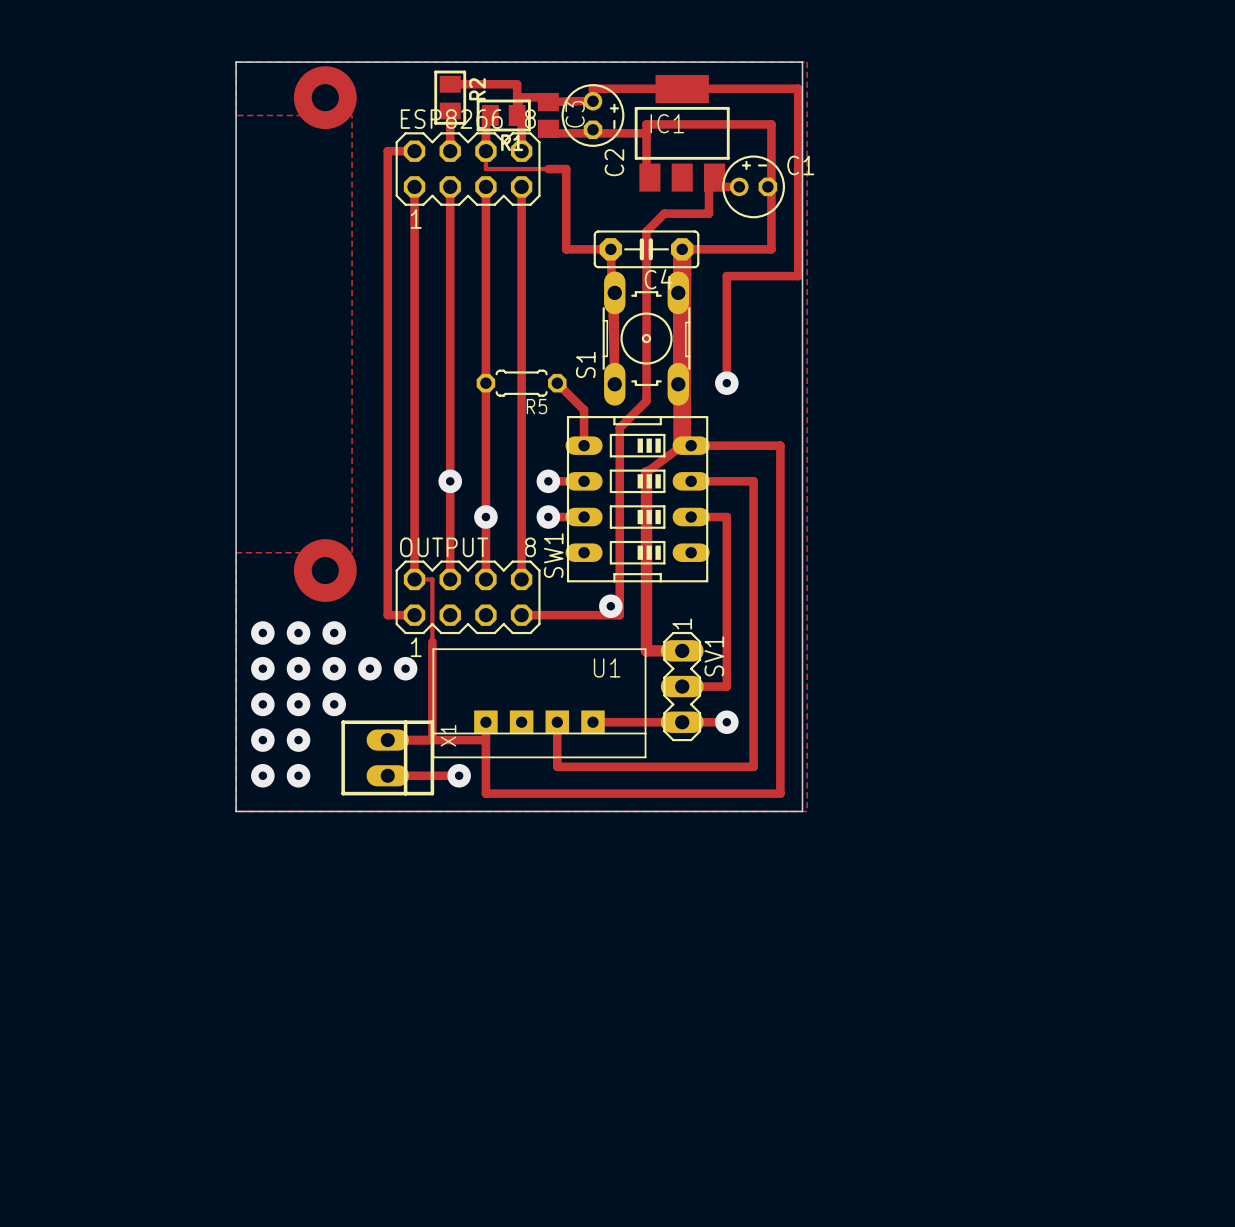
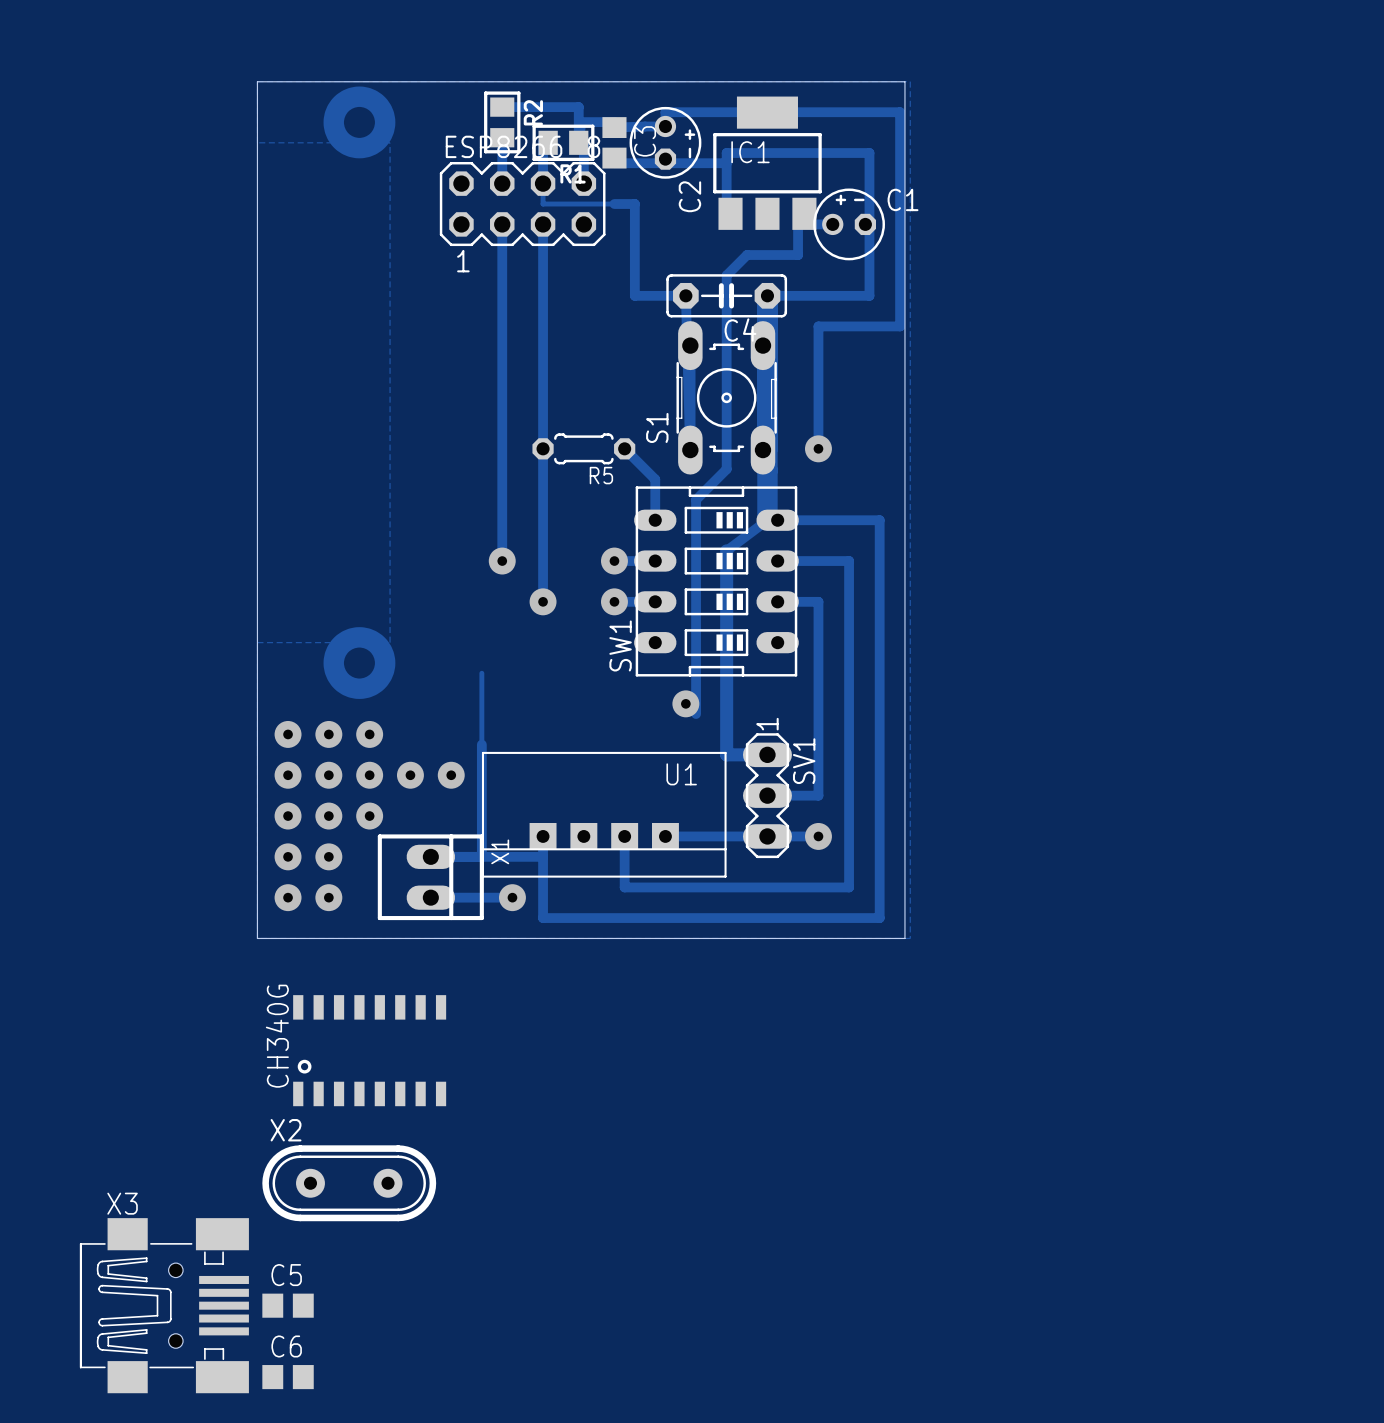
track: (414, 151) (387, 151) (387, 615) (414, 615) -> none
track: (414, 186) (414, 579) (432, 579) -> none
track: (521, 186) (521, 579) -> none
track: (450, 481) (450, 579) -> none
track: (485, 517) (485, 579) -> none
OUTPUT: (468, 597) -> none
track: (521, 615) (619, 615) -> none
part: none -> (369, 1050)
X2: none -> (349, 1183)
X3: none -> (164, 1305)
C5: none -> (288, 1305)
C6: none -> (288, 1377)

